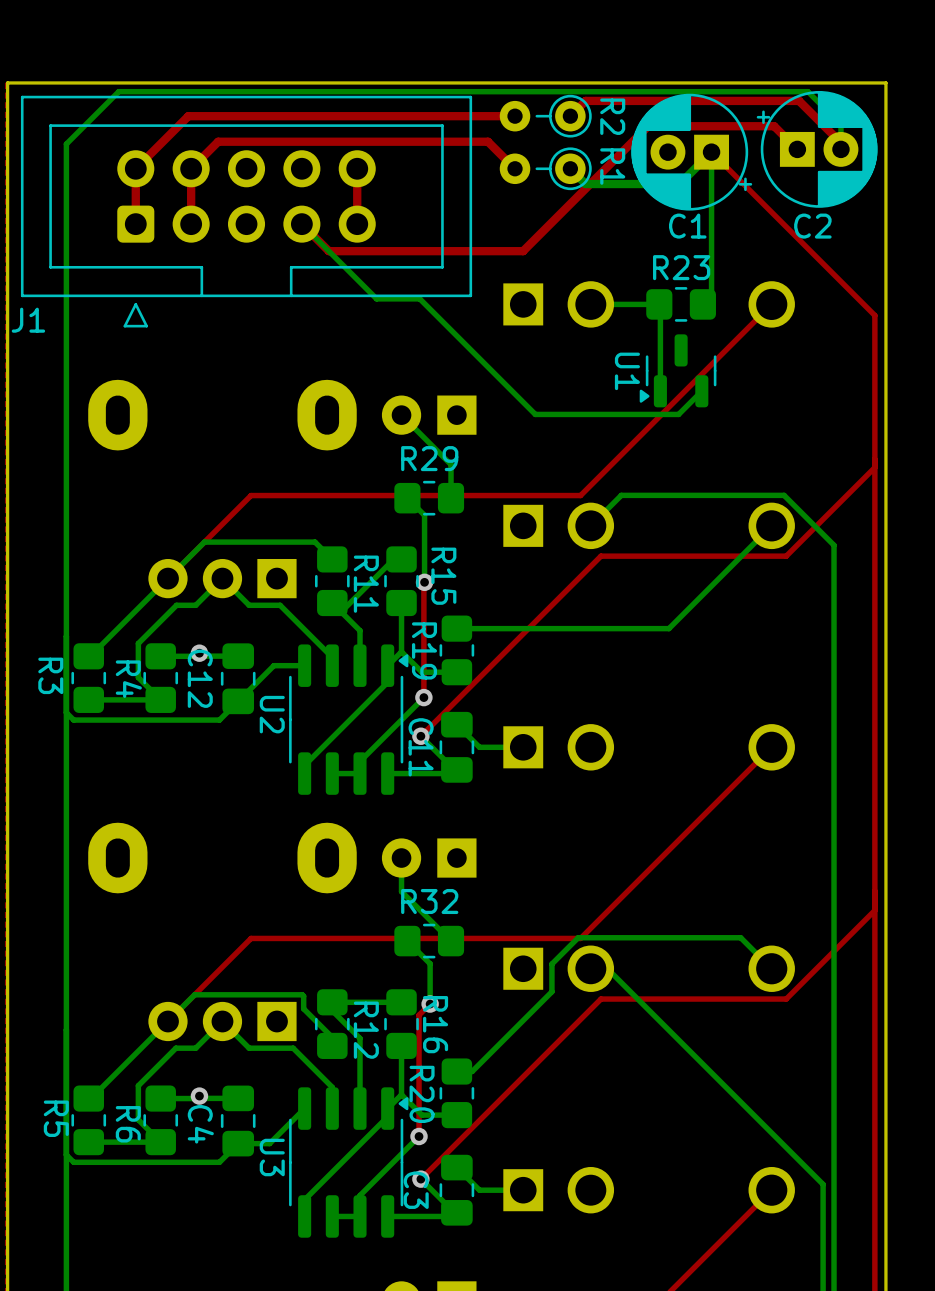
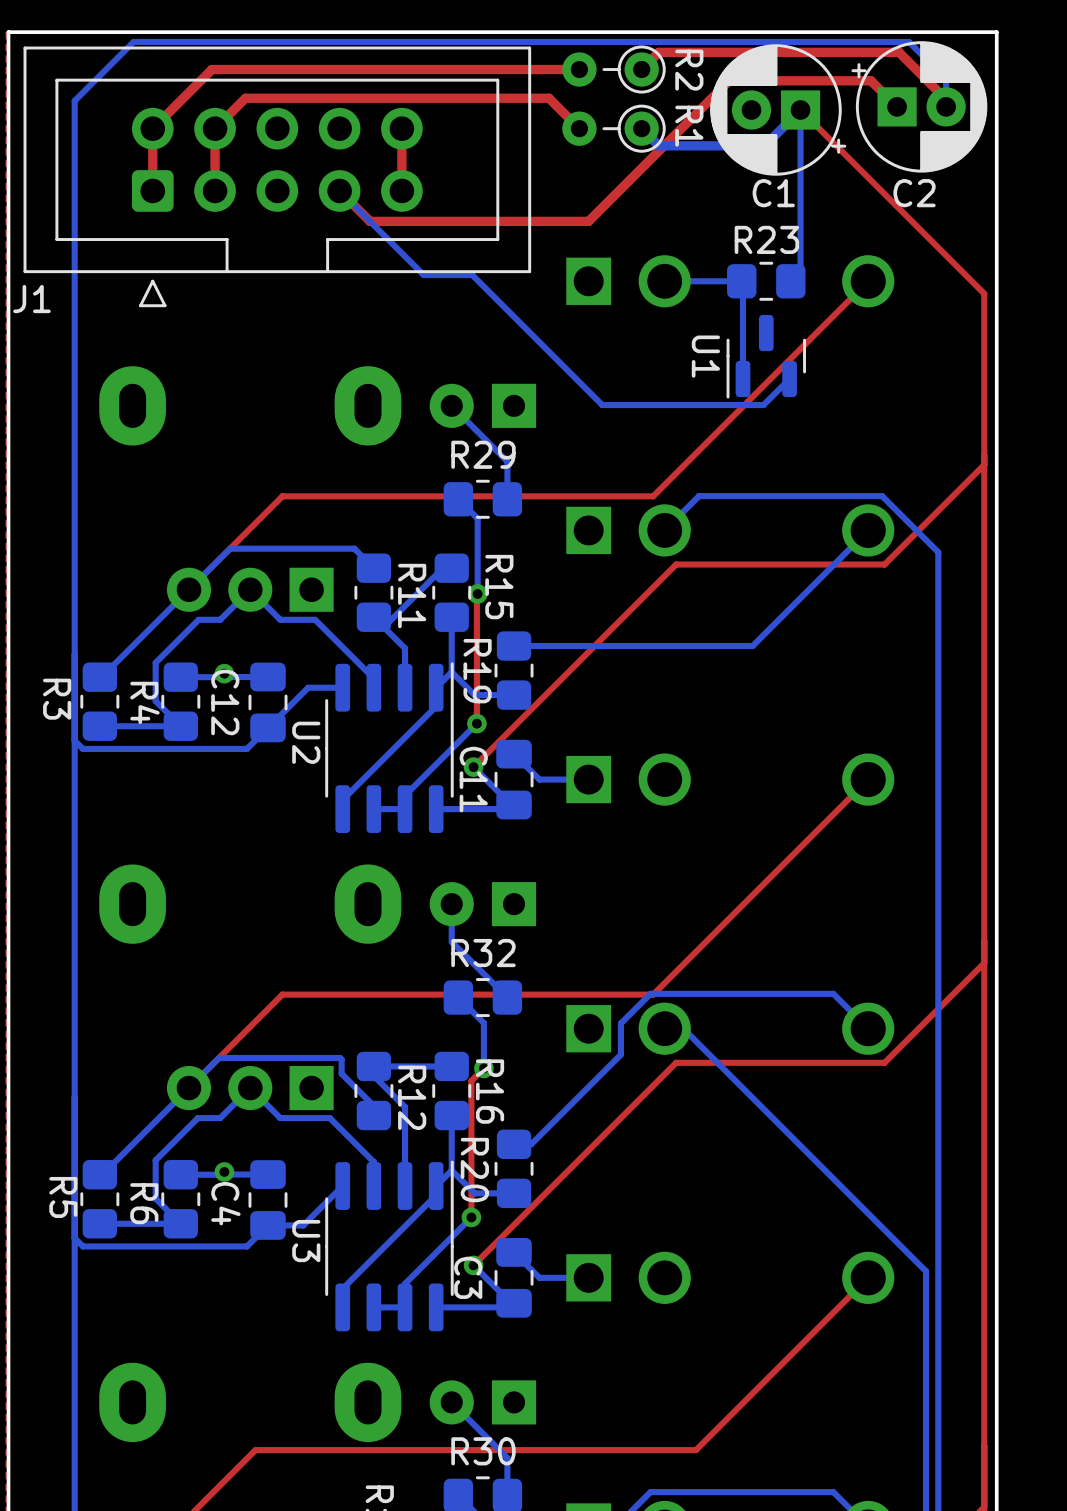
U1 footprint: [639, 334, 717, 408] -> [726, 314, 807, 399]
U2 footprint: [289, 644, 409, 795] -> [325, 662, 454, 834]
U3 footprint: [289, 1087, 409, 1238] -> [325, 1160, 454, 1332]

